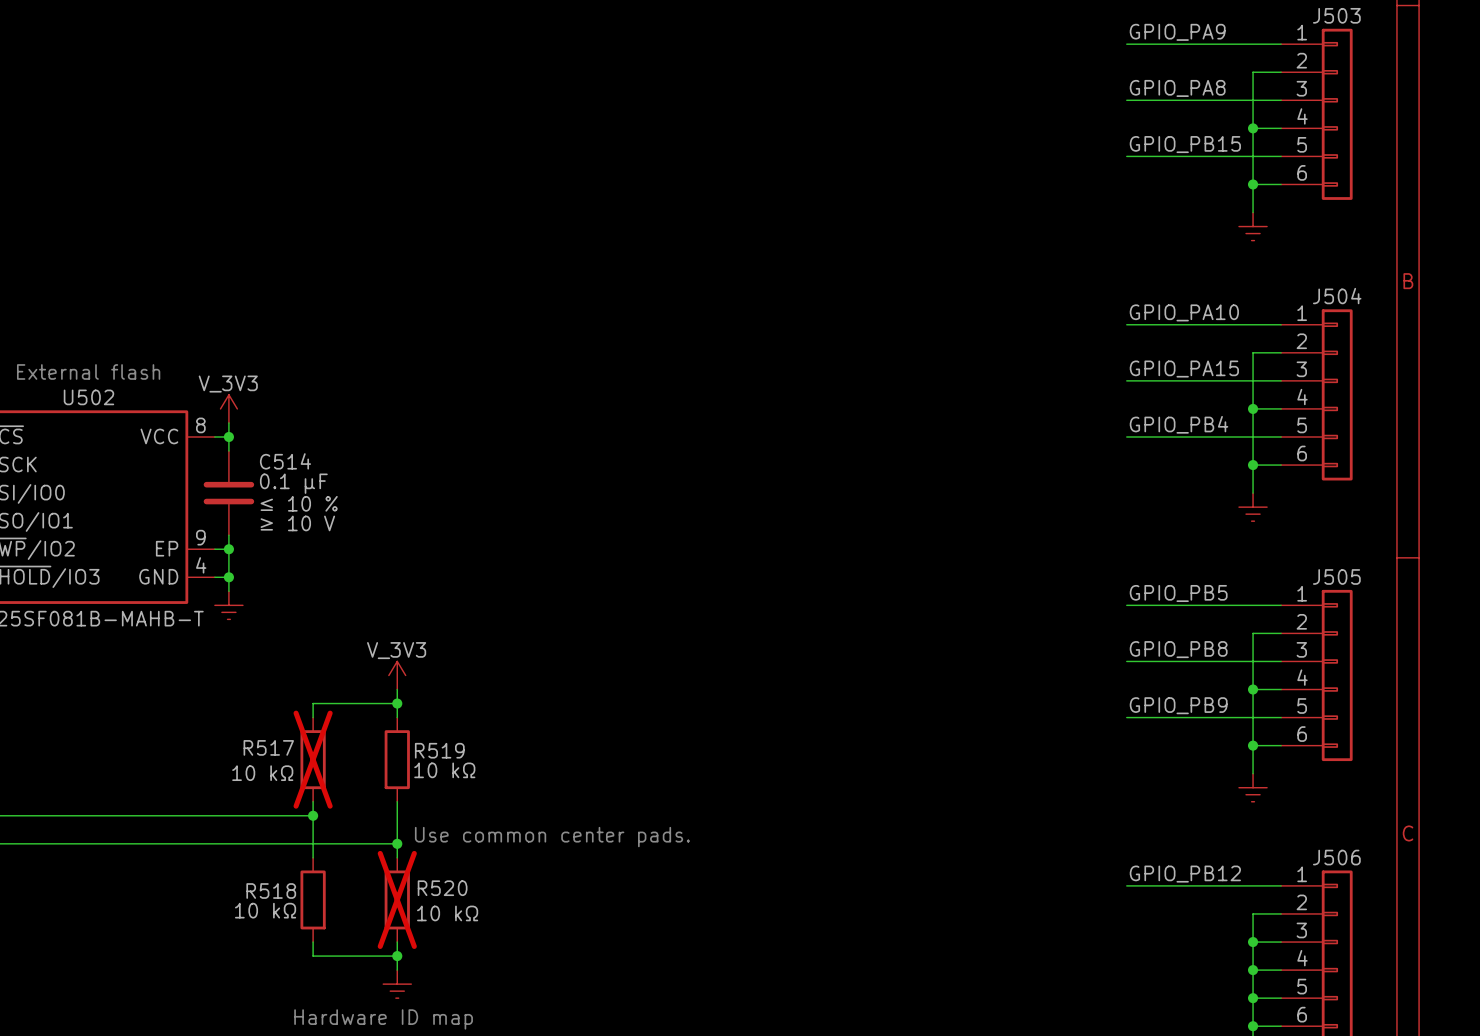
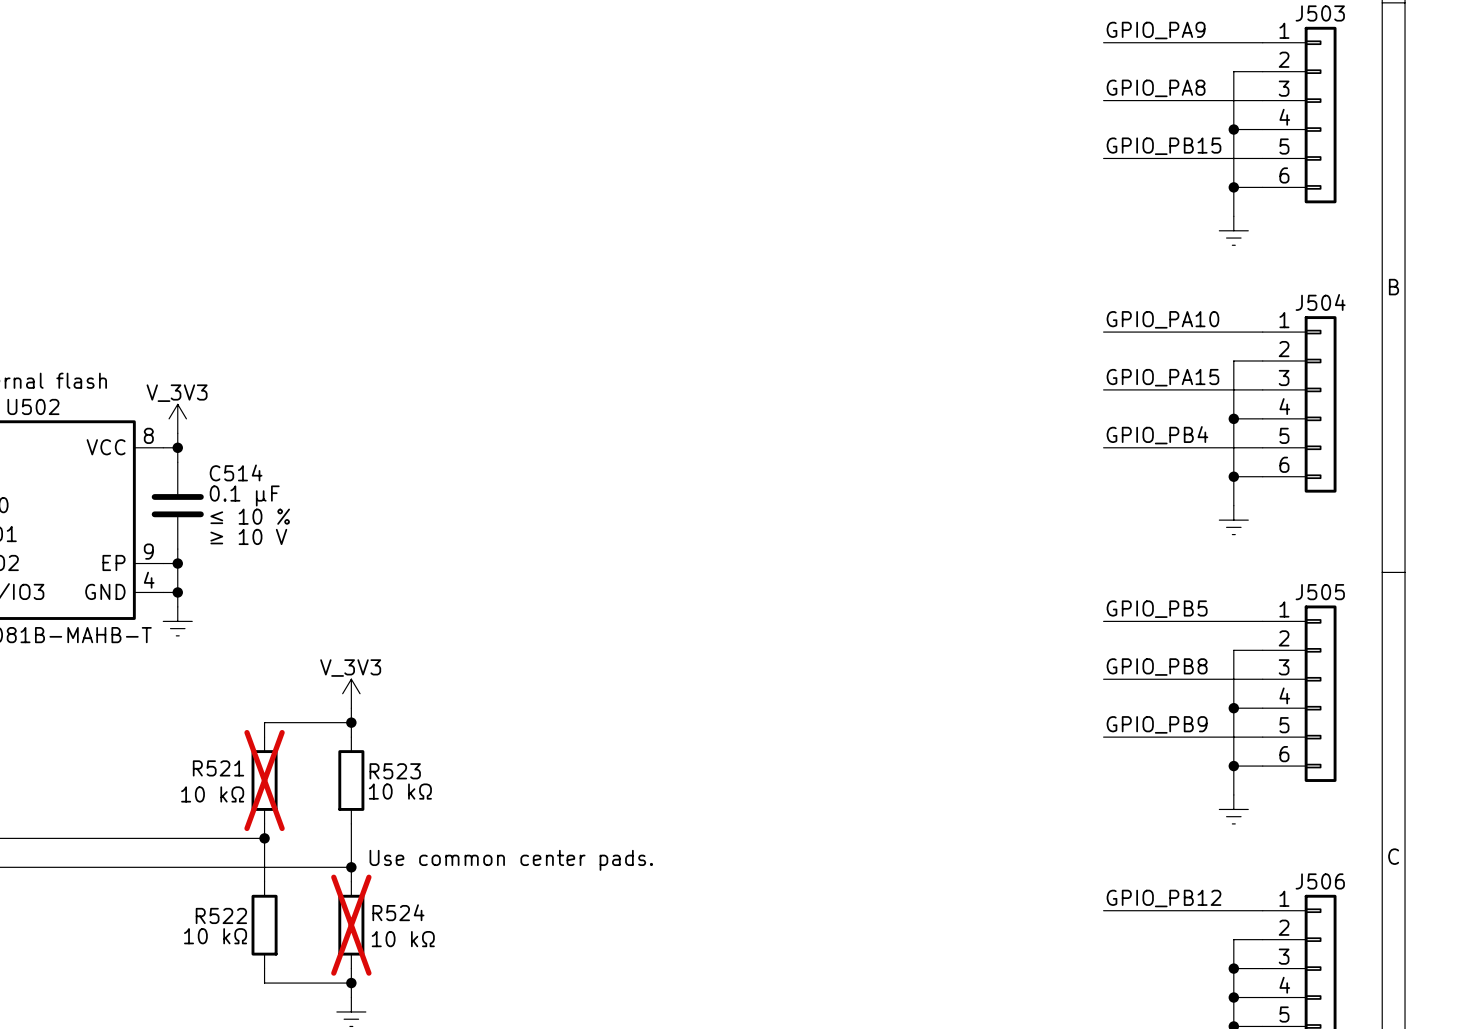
R517 name: R517 (268, 747) -> R521 (218, 768)
R519 name: R519 (439, 750) -> R523 (395, 771)
R520 name: R520 (442, 888) -> R524 (398, 912)
R518 name: R518 (271, 891) -> R522 (221, 915)

